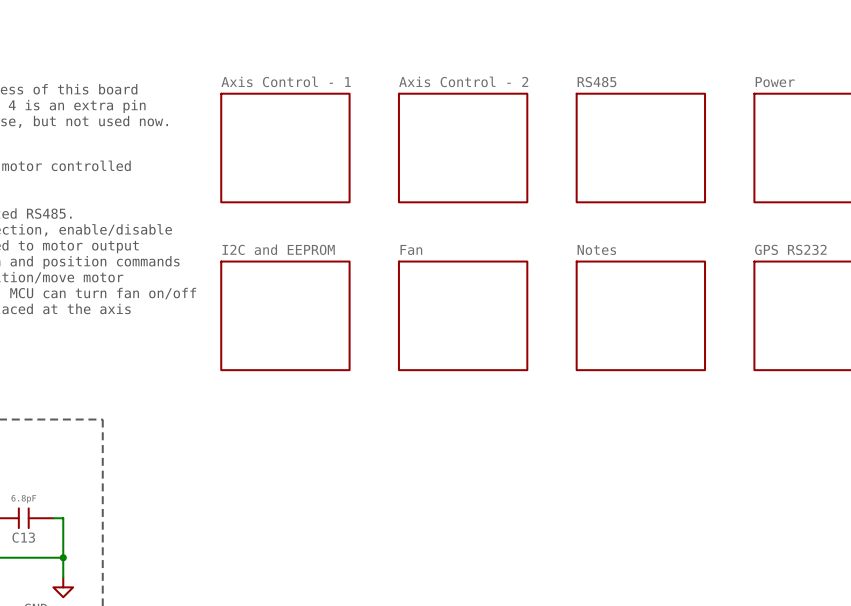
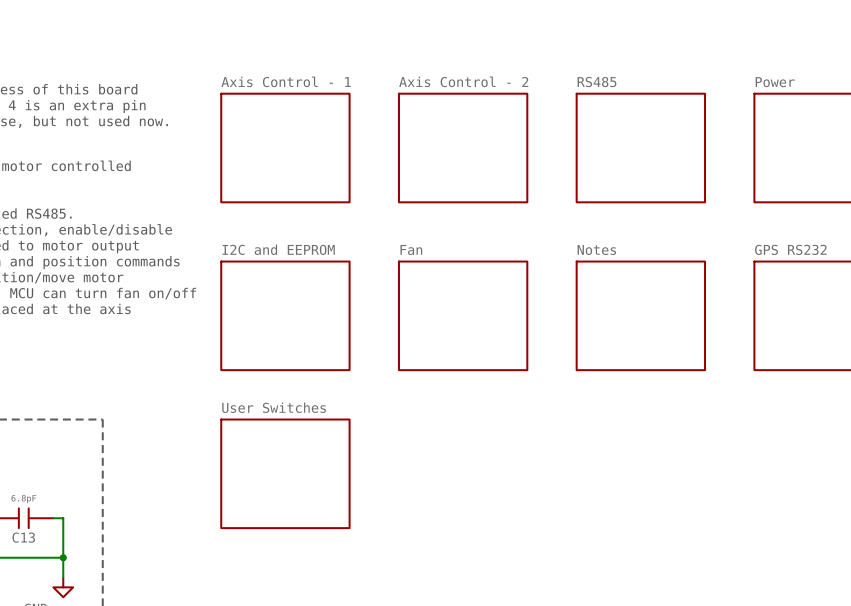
sheet User Switches: none -> (285, 473)

